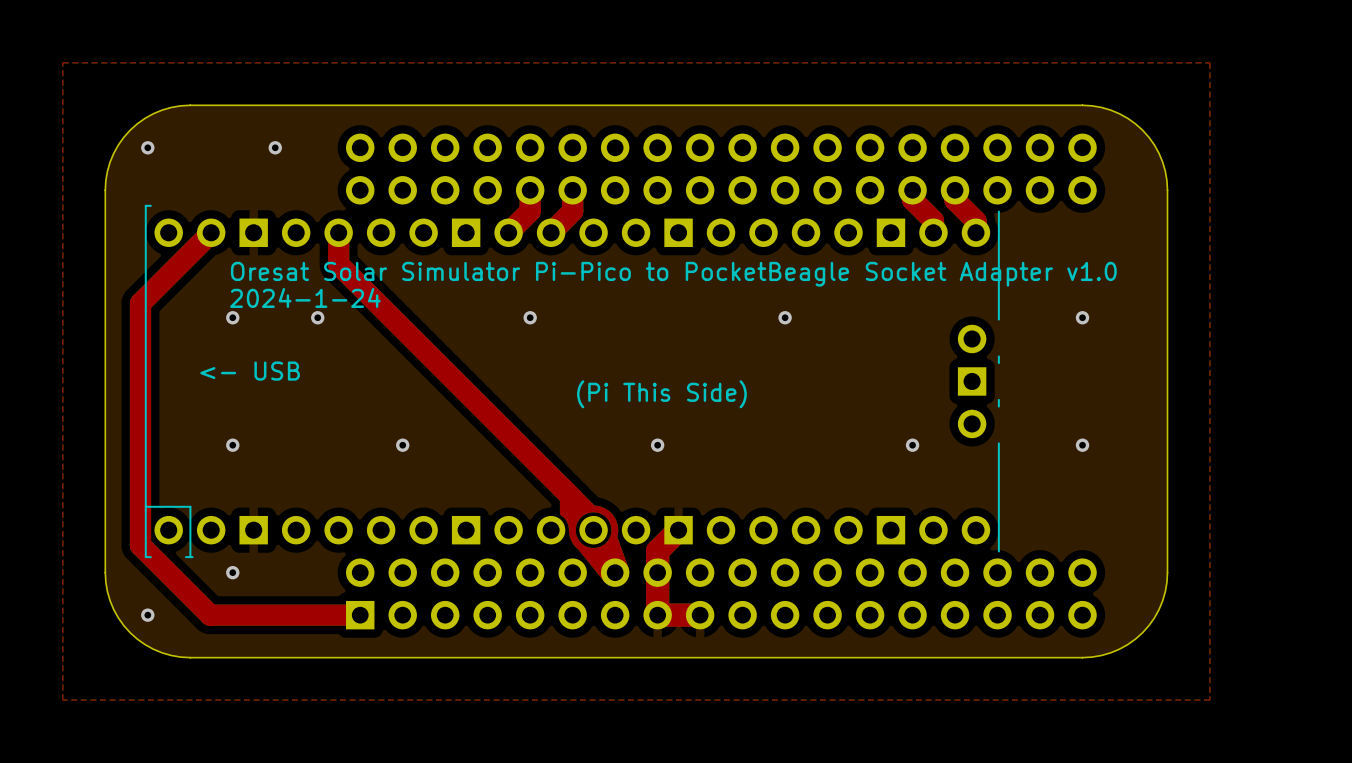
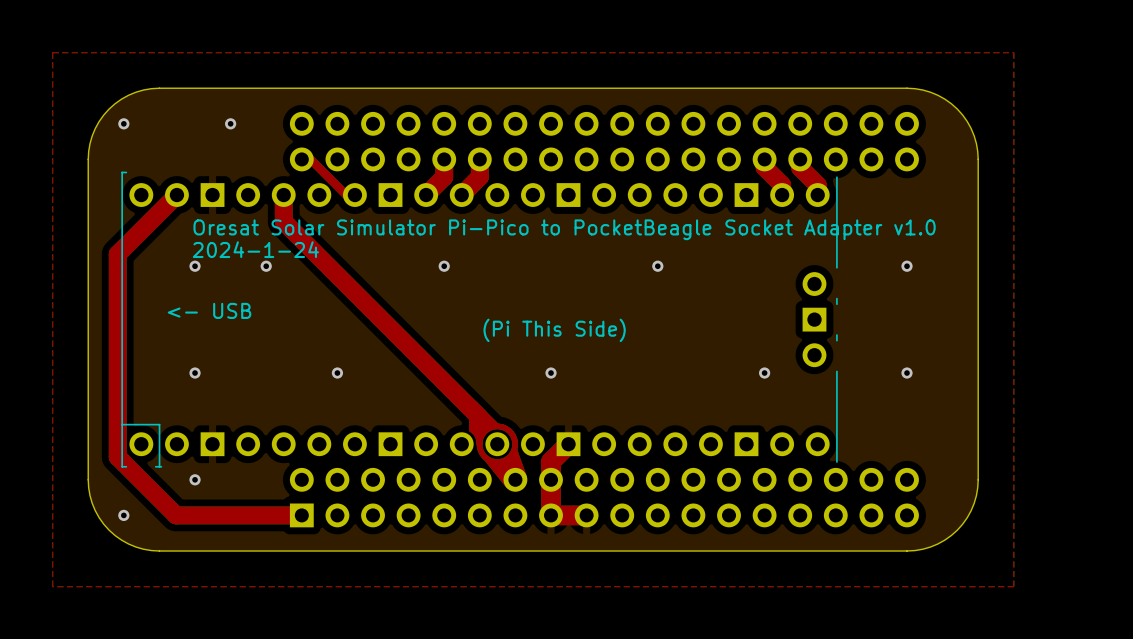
top track: none -> (301, 159) (310, 159) (346, 195) (354, 195)

